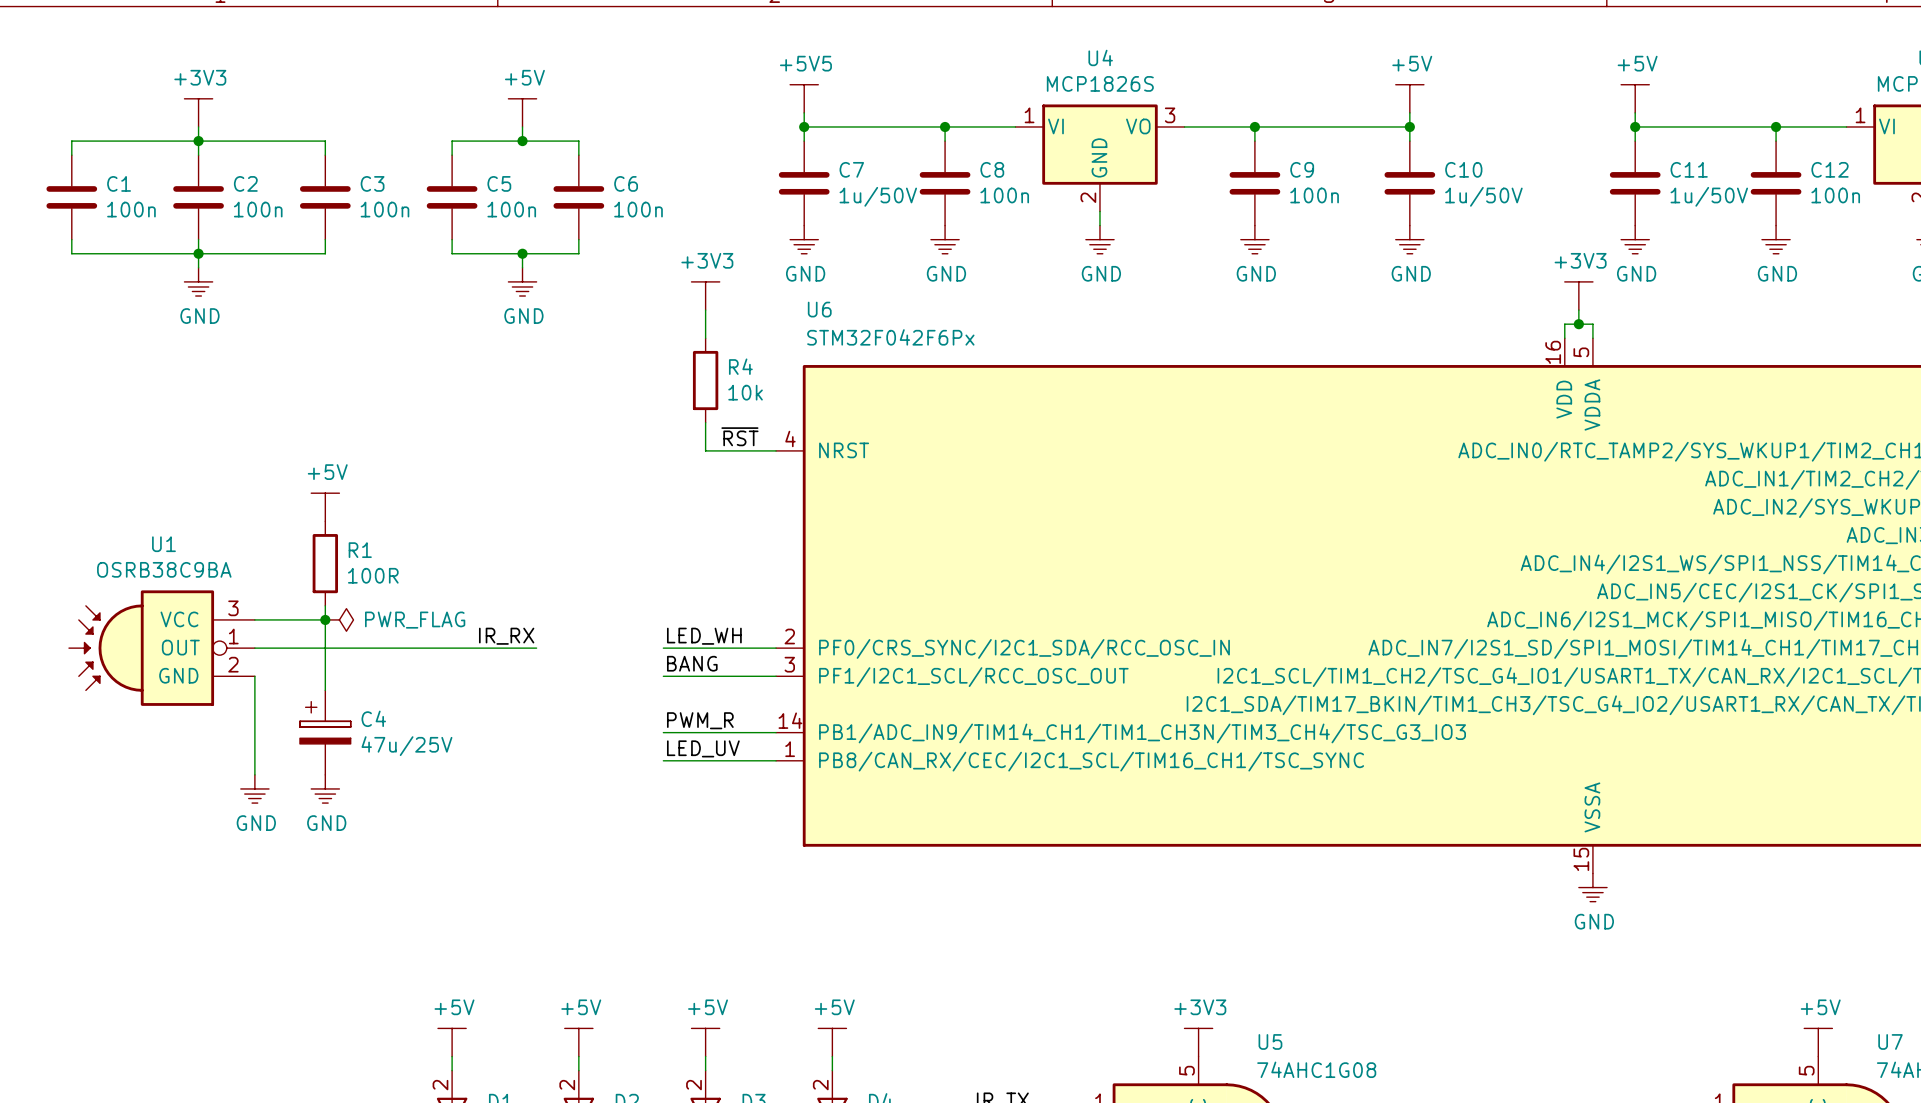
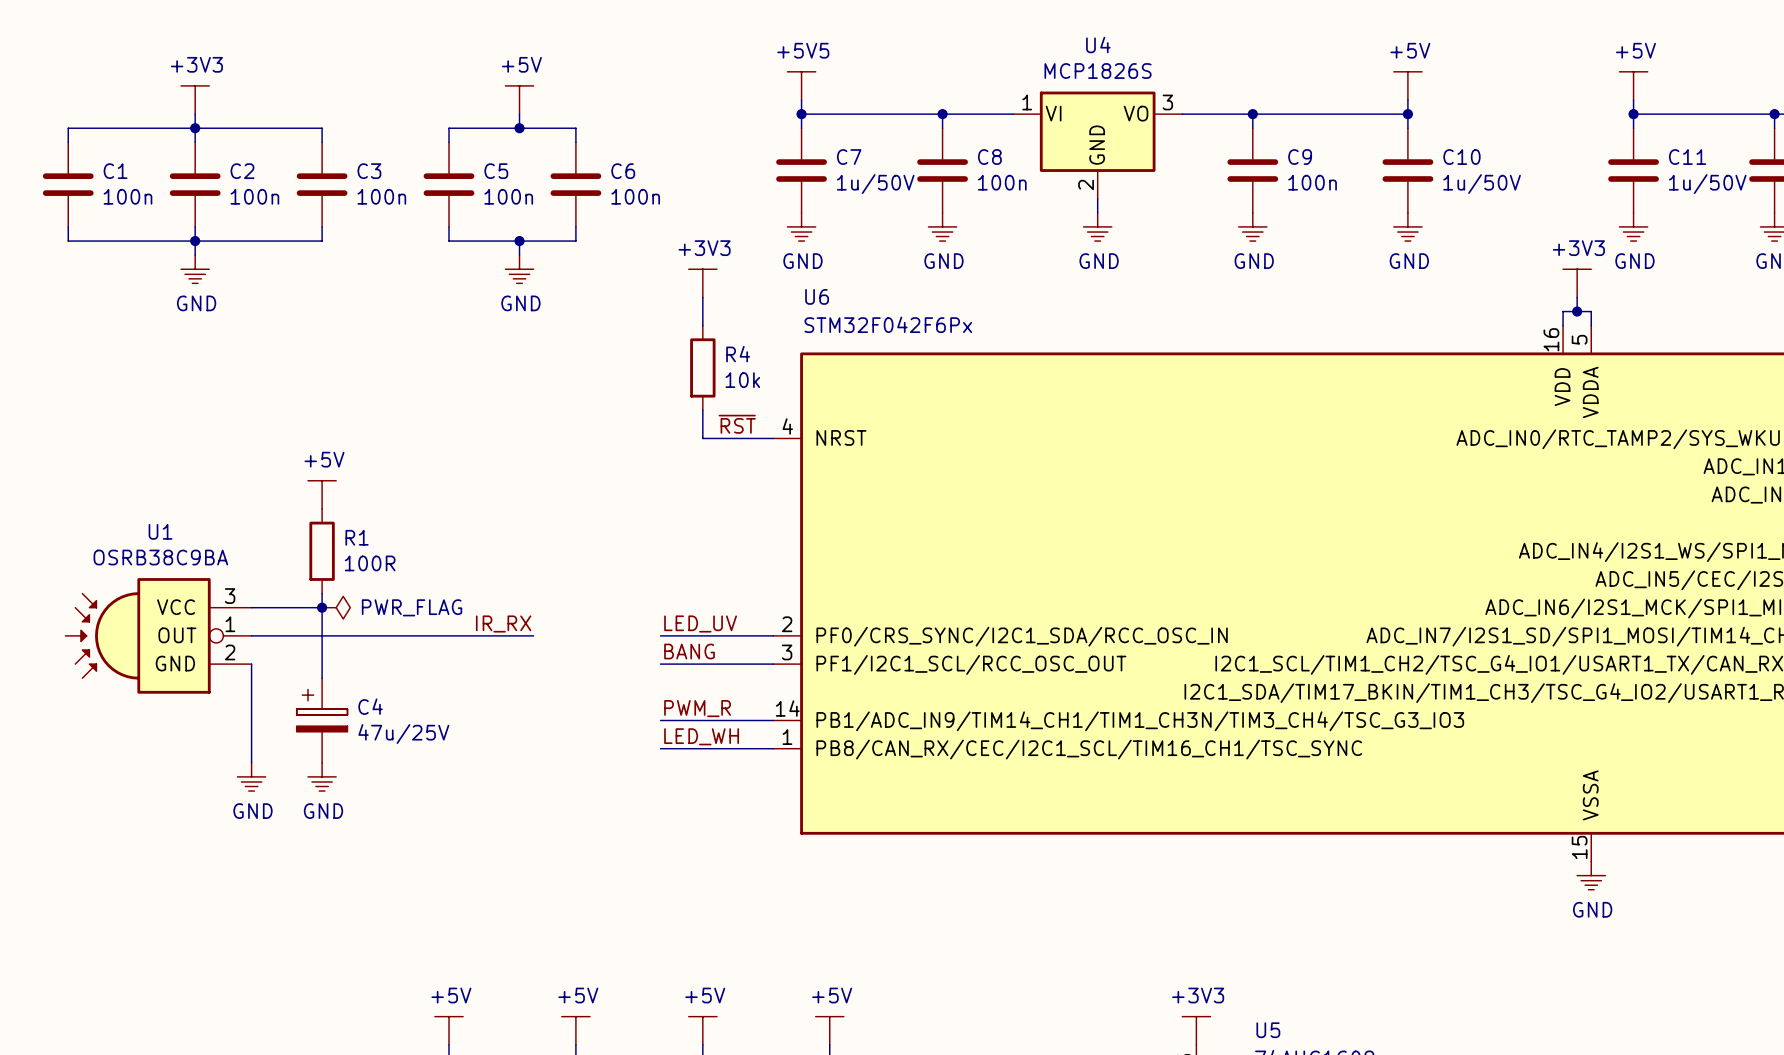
label: LED_WH (704, 636) -> LED_UV (700, 623)
label: LED_UV (703, 748) -> LED_WH (701, 736)

